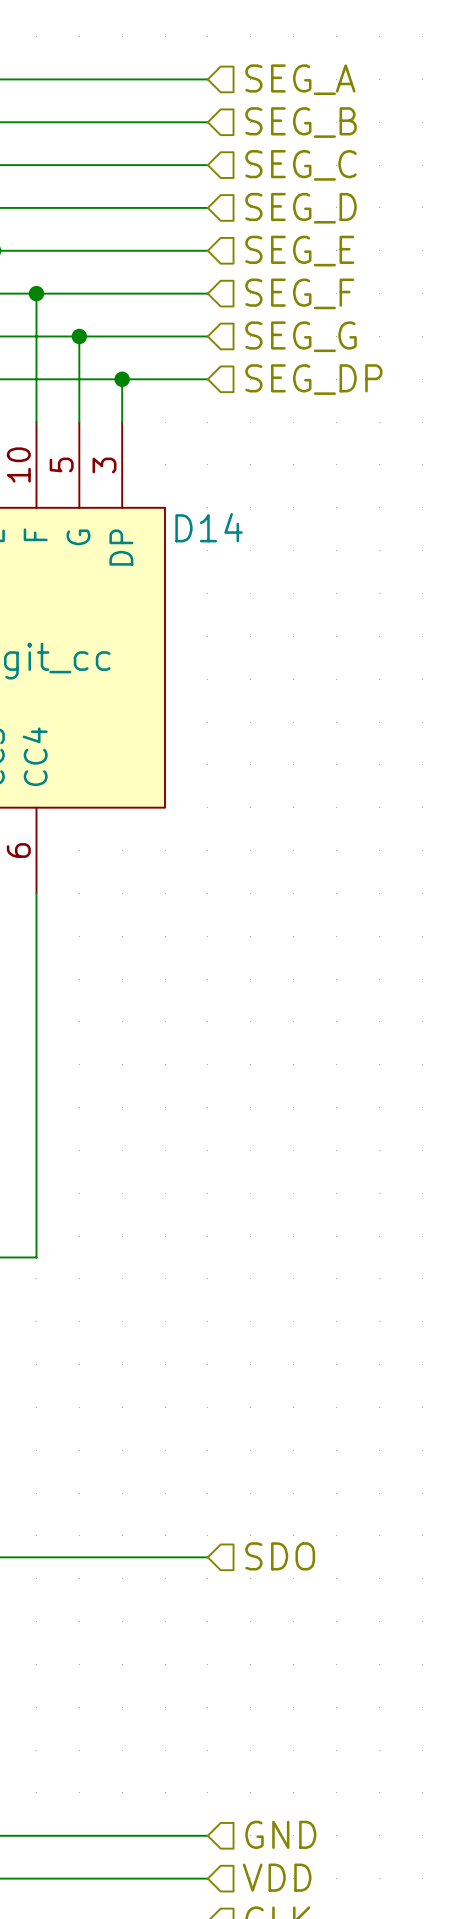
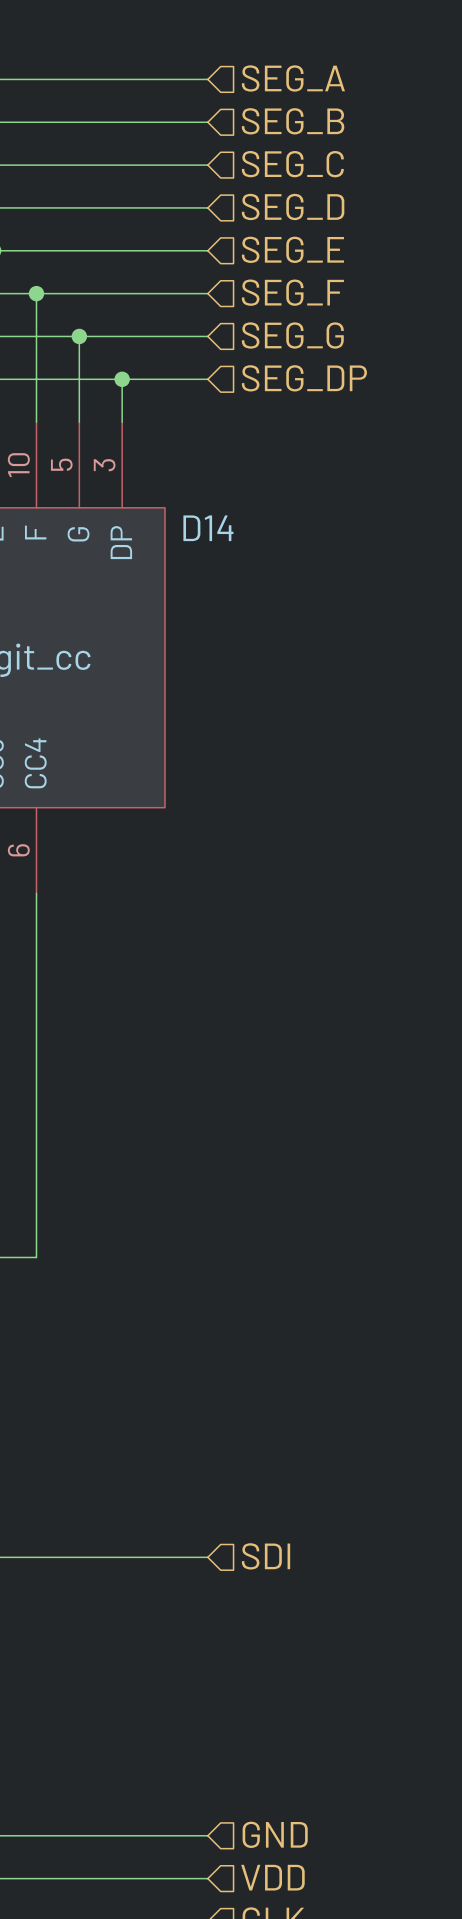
hierarchical label: SDO (280, 1556) -> SDI (266, 1556)

